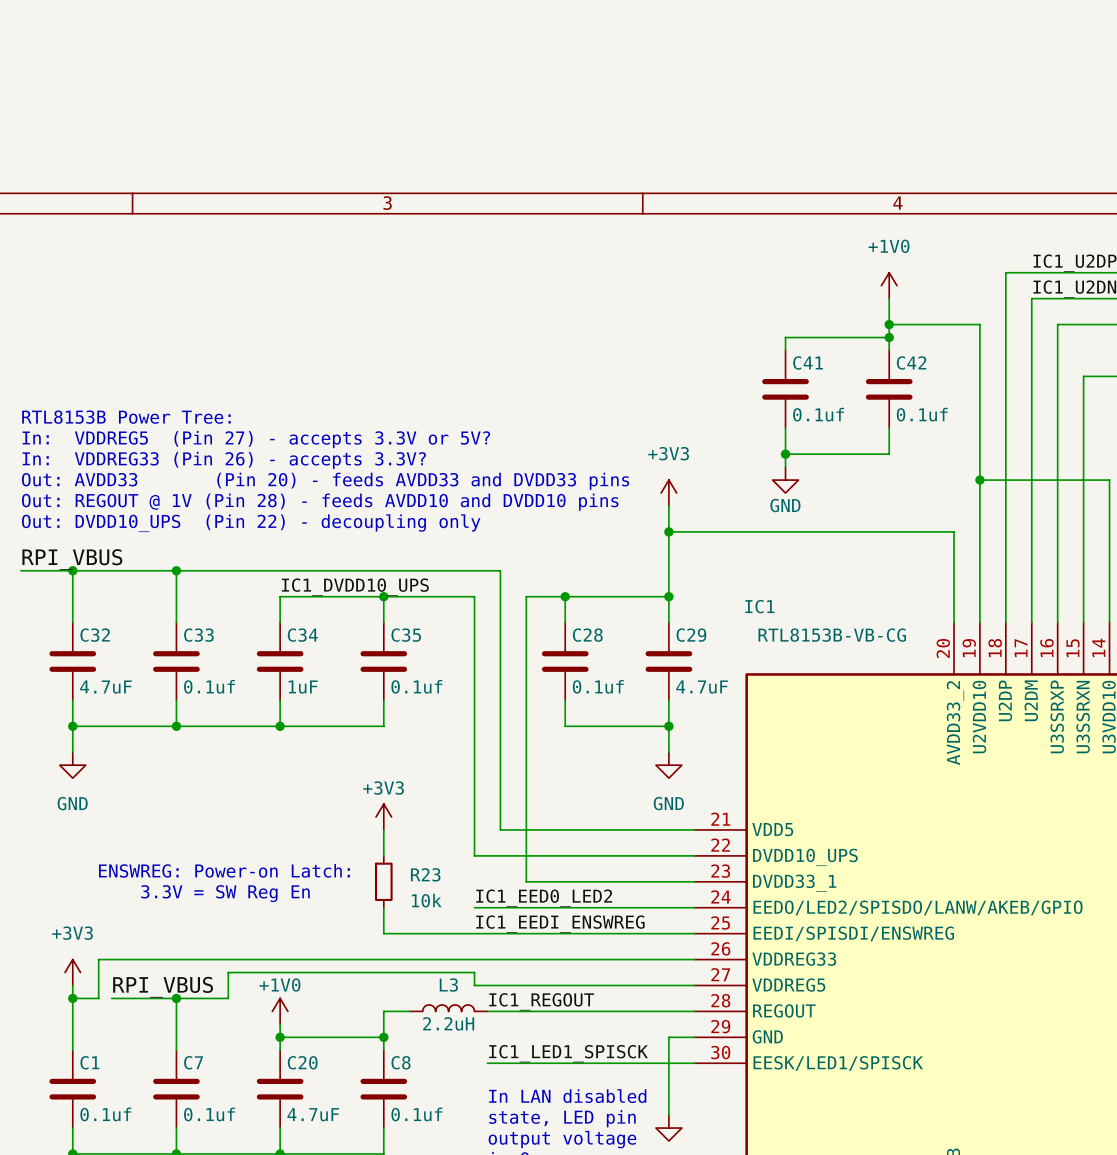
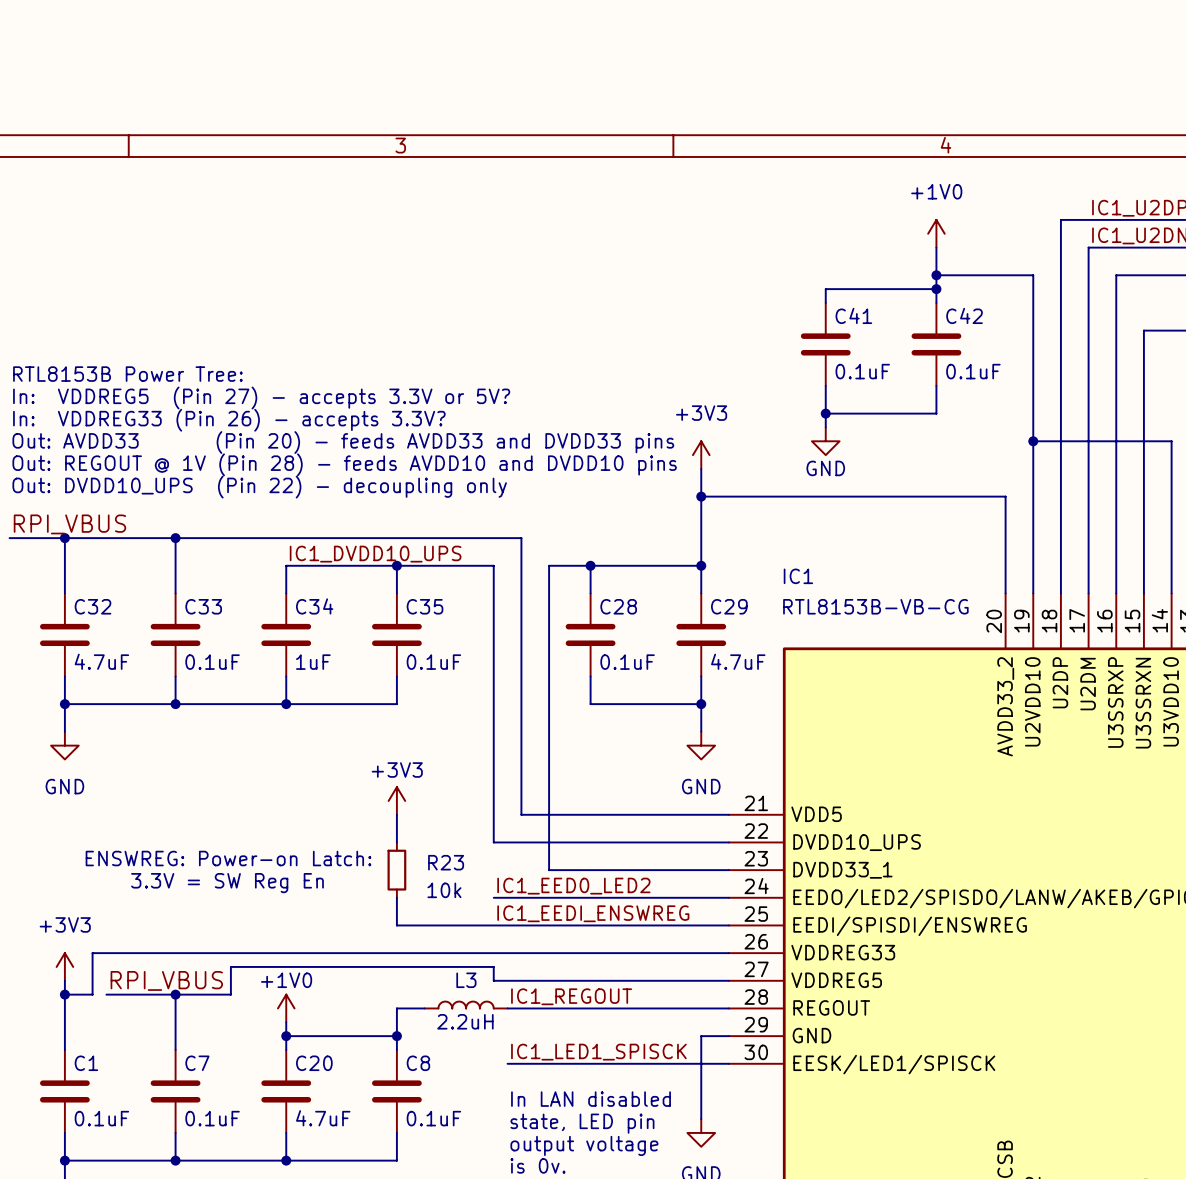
C41 value: 0.1uf (818, 414) -> 0.1uF (862, 371)
C42 value: 0.1uf (922, 414) -> 0.1uF (973, 371)
C33 value: 0.1uf (209, 686) -> 0.1uF (212, 662)
C35 value: 0.1uf (416, 686) -> 0.1uF (433, 662)
C28 value: 0.1uf (598, 686) -> 0.1uF (627, 662)
C1 value: 0.1uf (105, 1114) -> 0.1uF (101, 1118)
C7 value: 0.1uf (209, 1114) -> 0.1uF (212, 1118)
C8 value: 0.1uf (416, 1114) -> 0.1uF (433, 1118)

